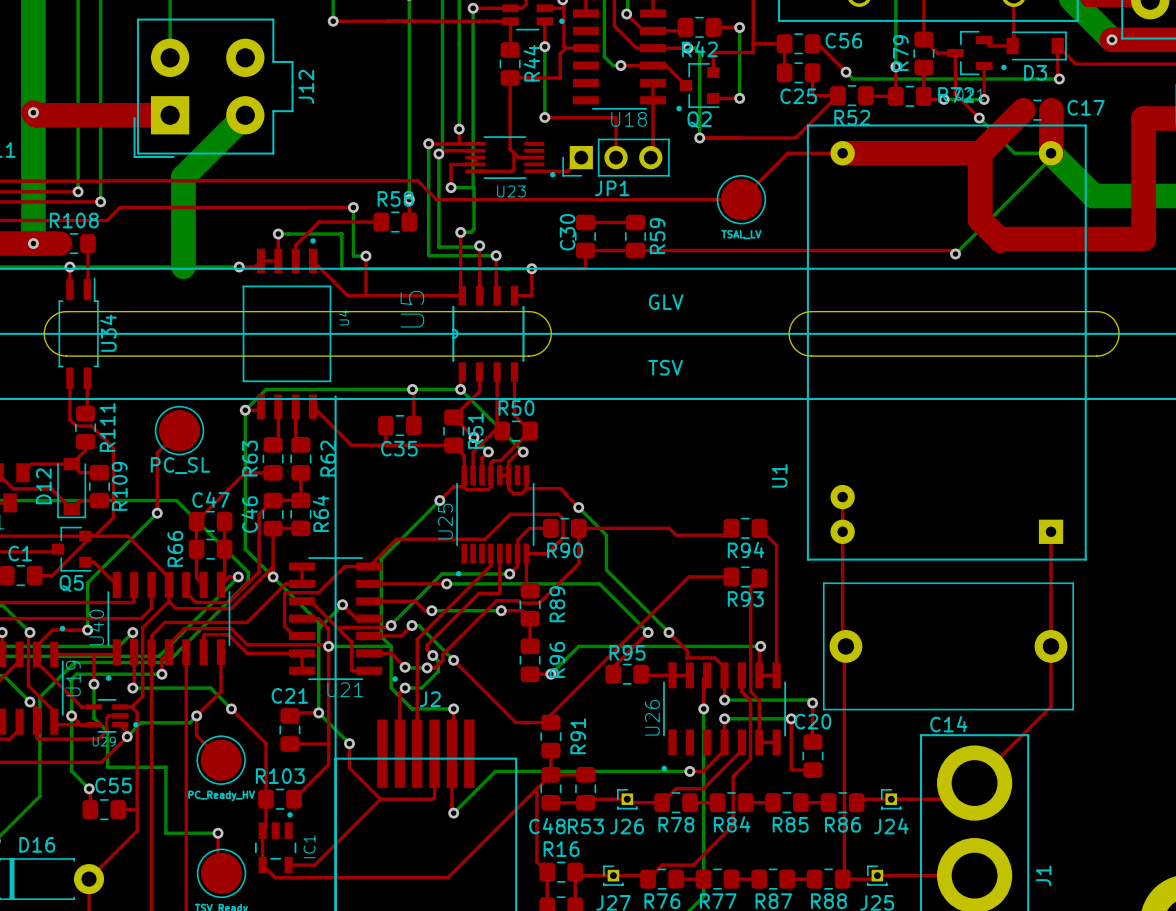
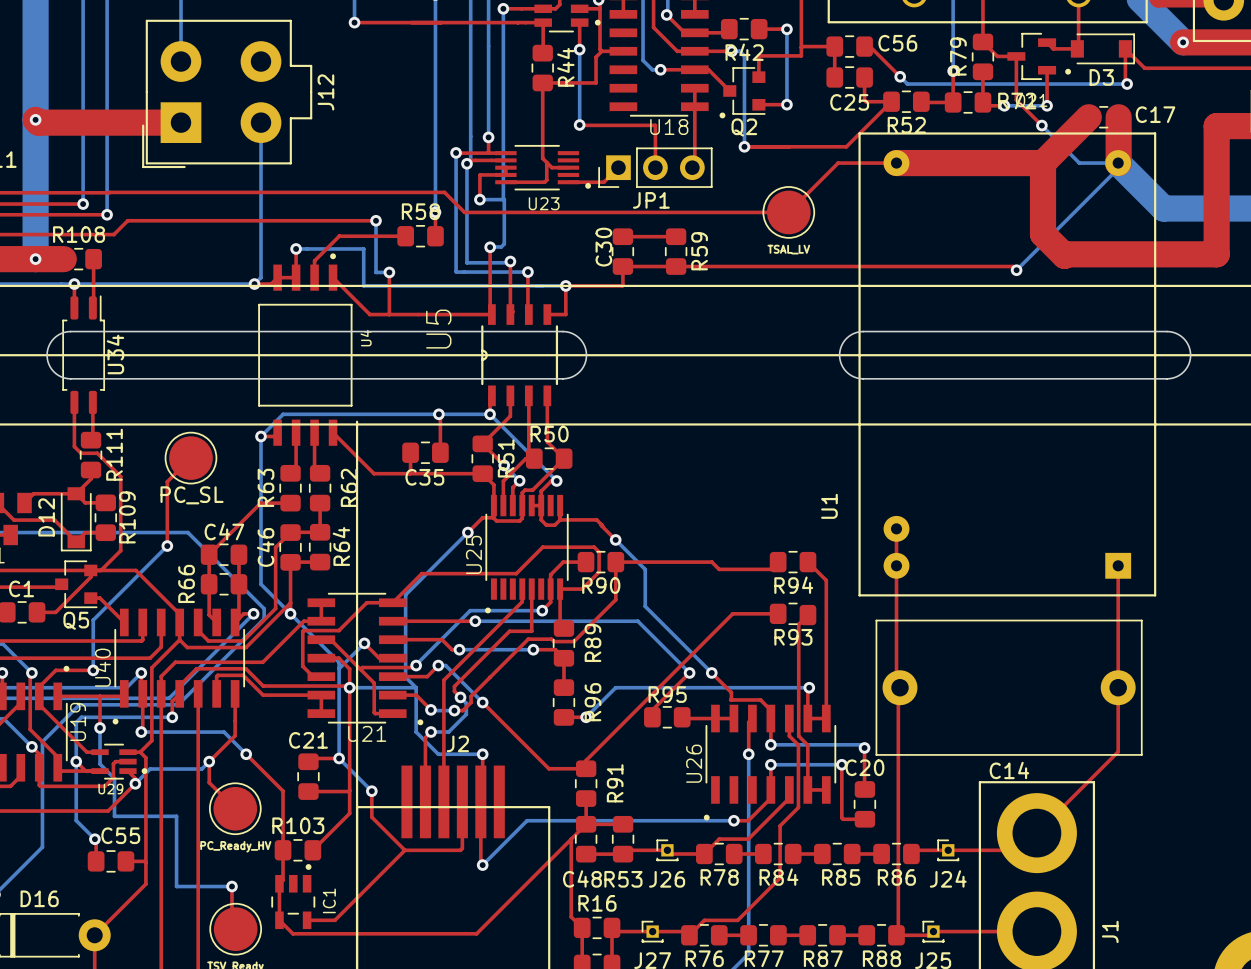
bottom track: (245, 115) (183, 177) (183, 266) -> (261, 122) (261, 277) (254, 284)
text: GLV (666, 302) -> none
text: TSV (665, 367) -> none

